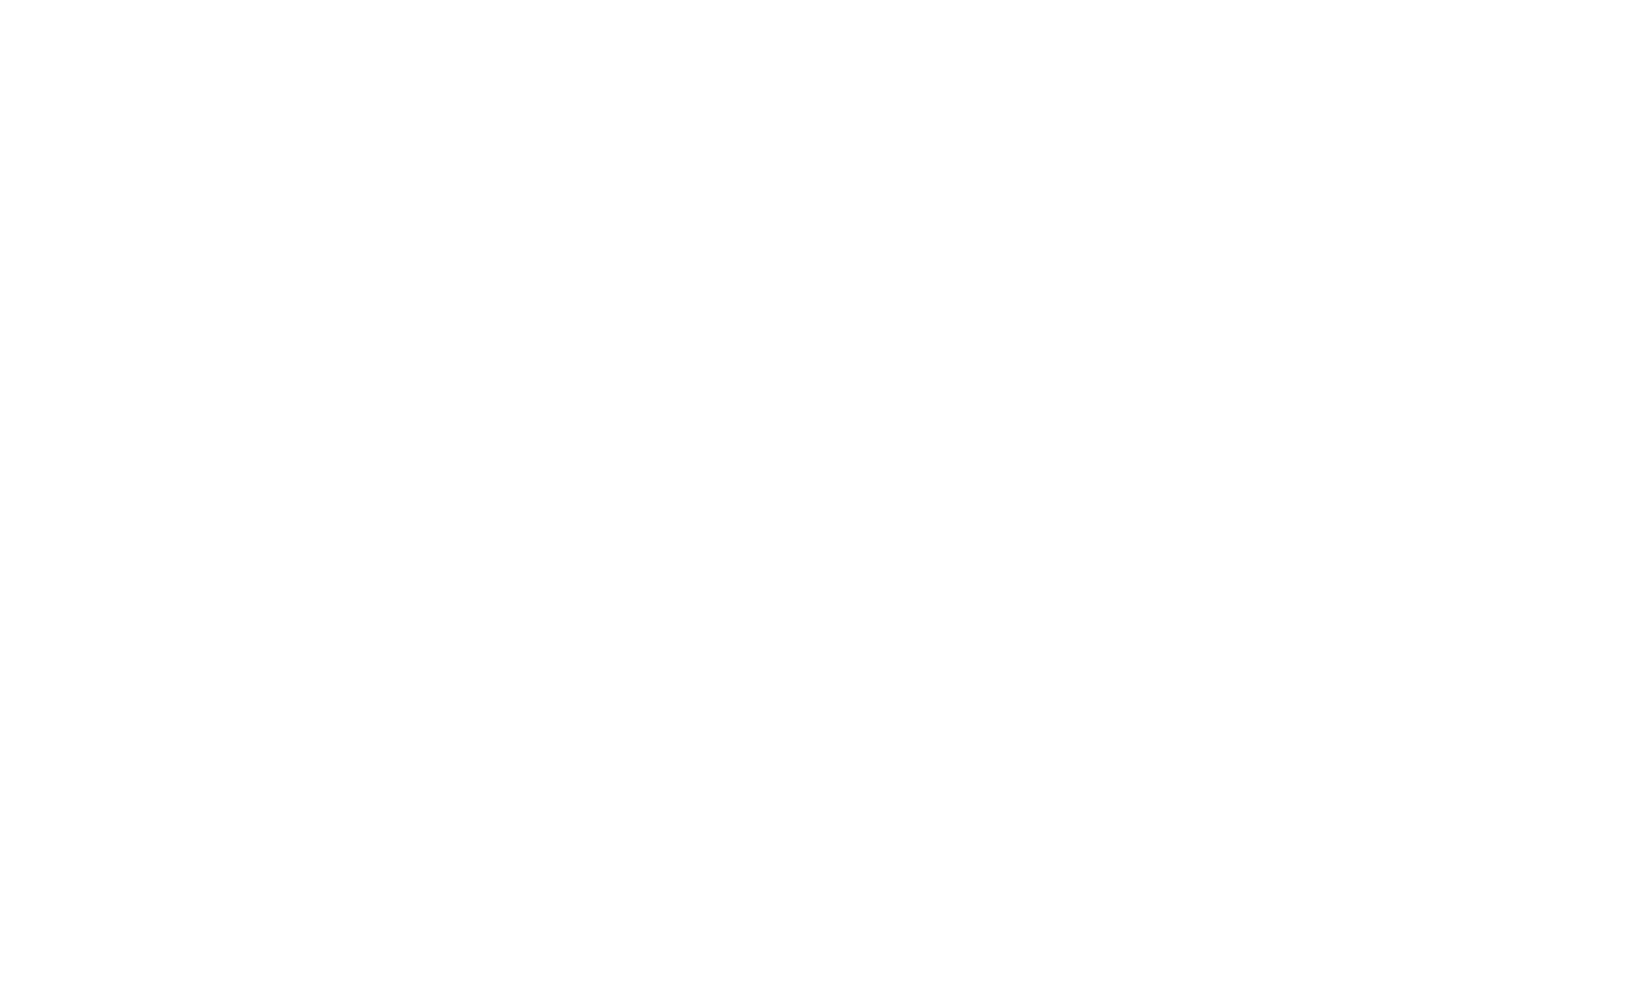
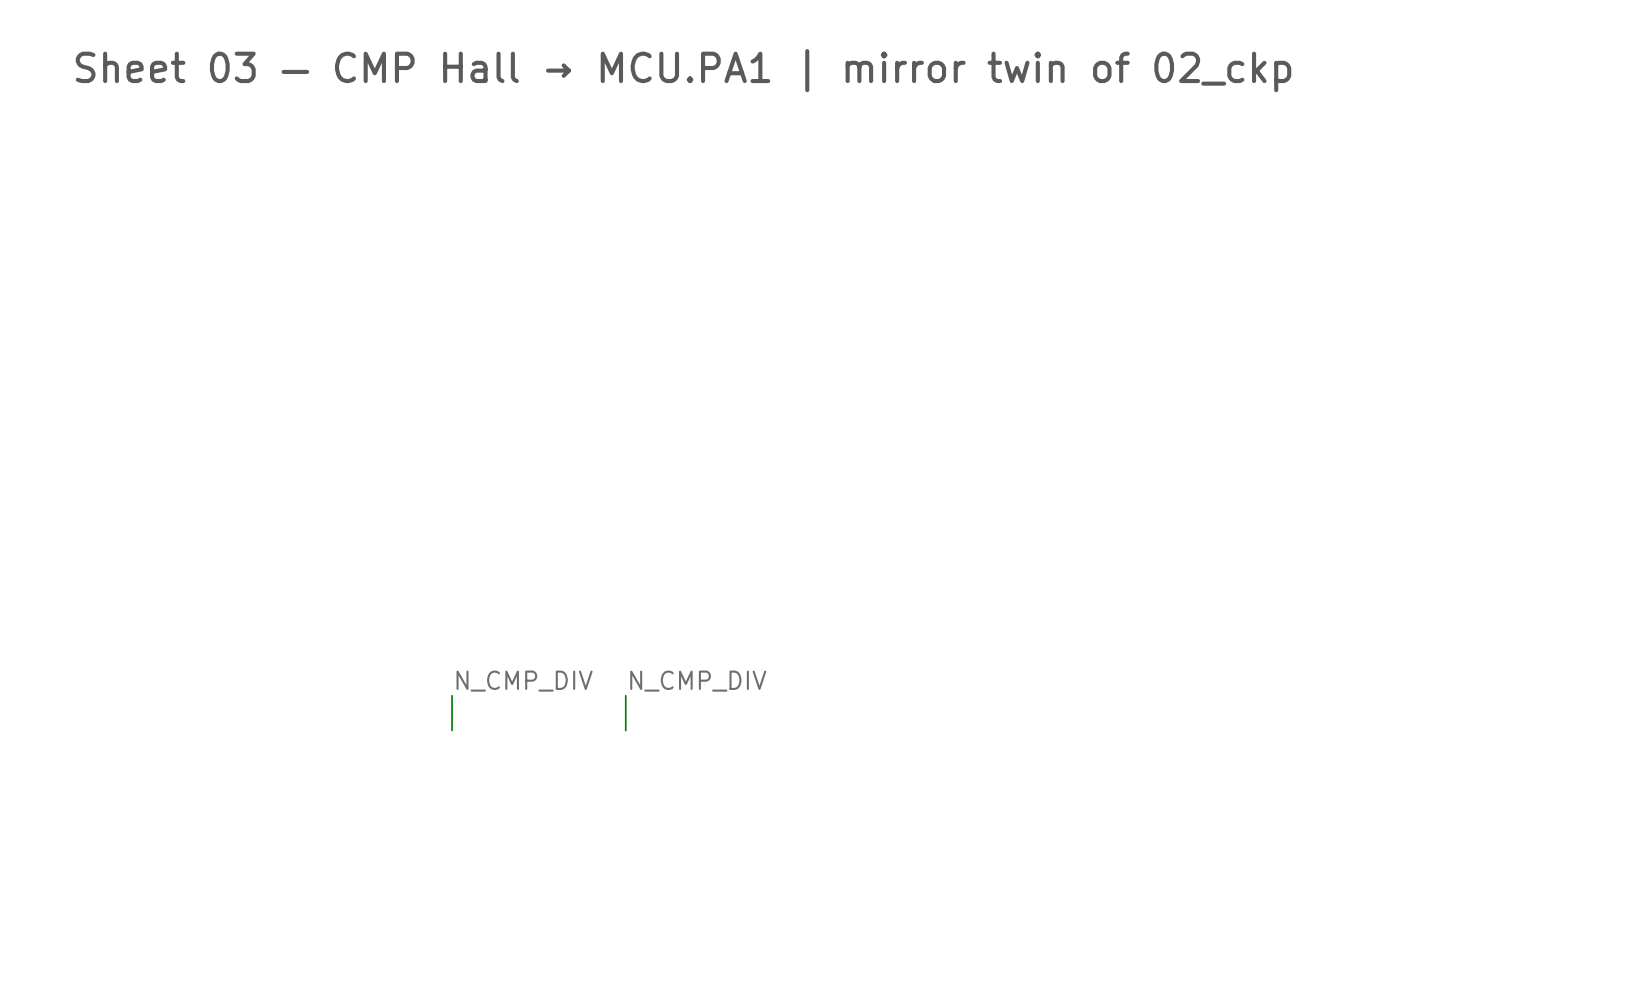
text: none -> Sheet 03 — CMP Hall → MCU.PA1 | mirror twin of 02_ckp (683, 70)
label: none -> N_CMP_DIV (524, 681)
label: none -> N_CMP_DIV (698, 681)
wire: none -> (452, 695) (452, 730)
wire: none -> (625, 695) (625, 730)

